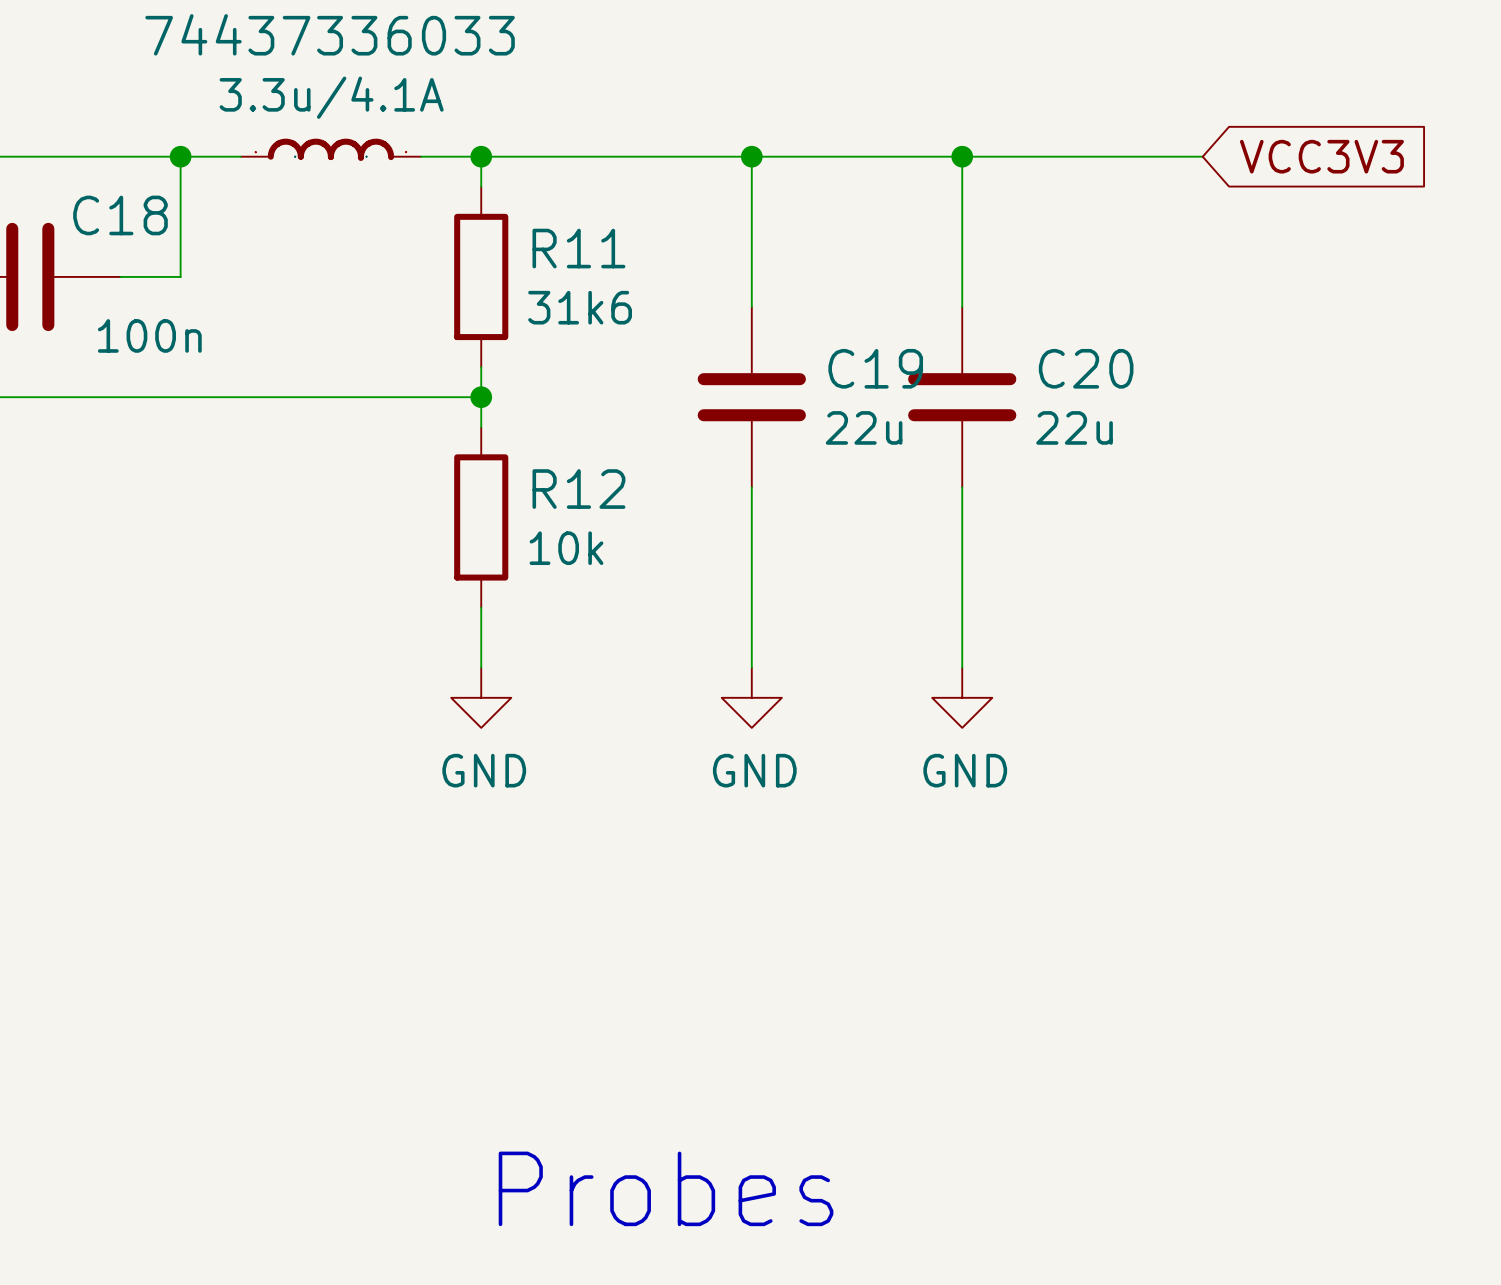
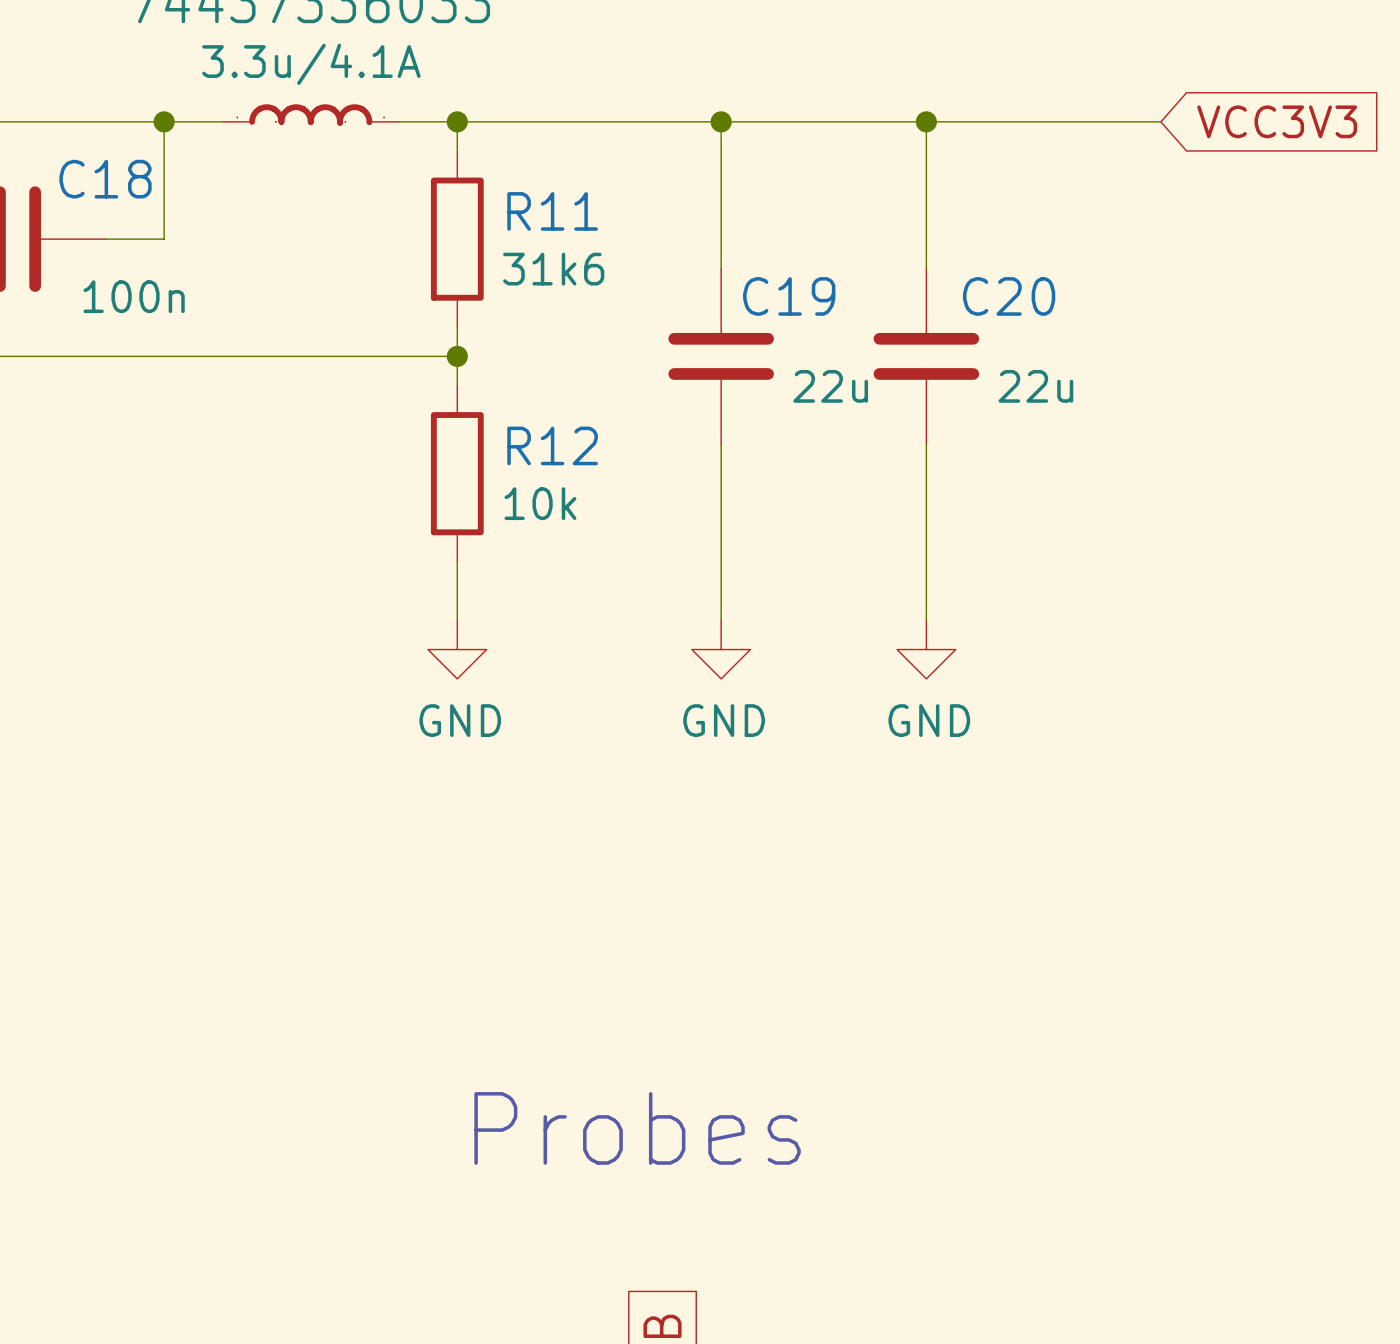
C19 name position: C19 (875, 368) -> C19 (789, 296)
C20 name position: C20 (1086, 368) -> C20 (1009, 296)

